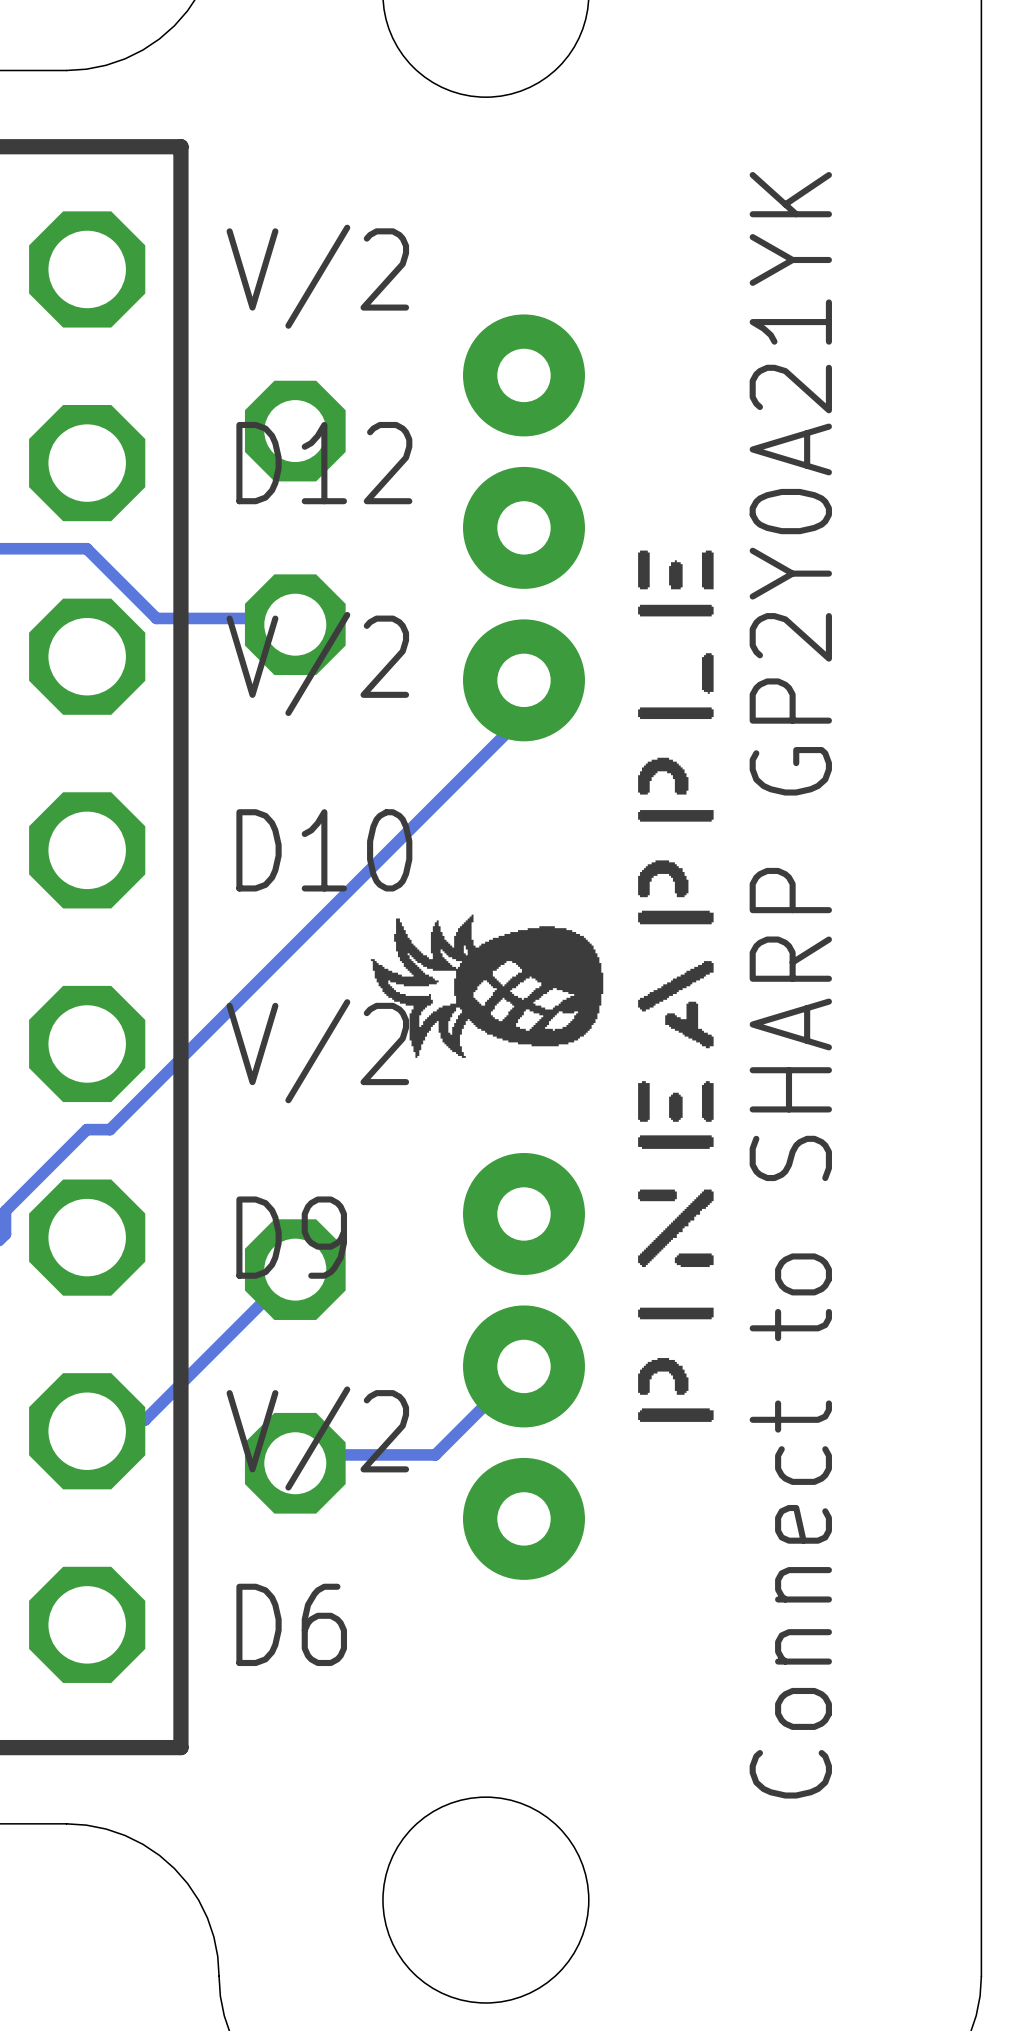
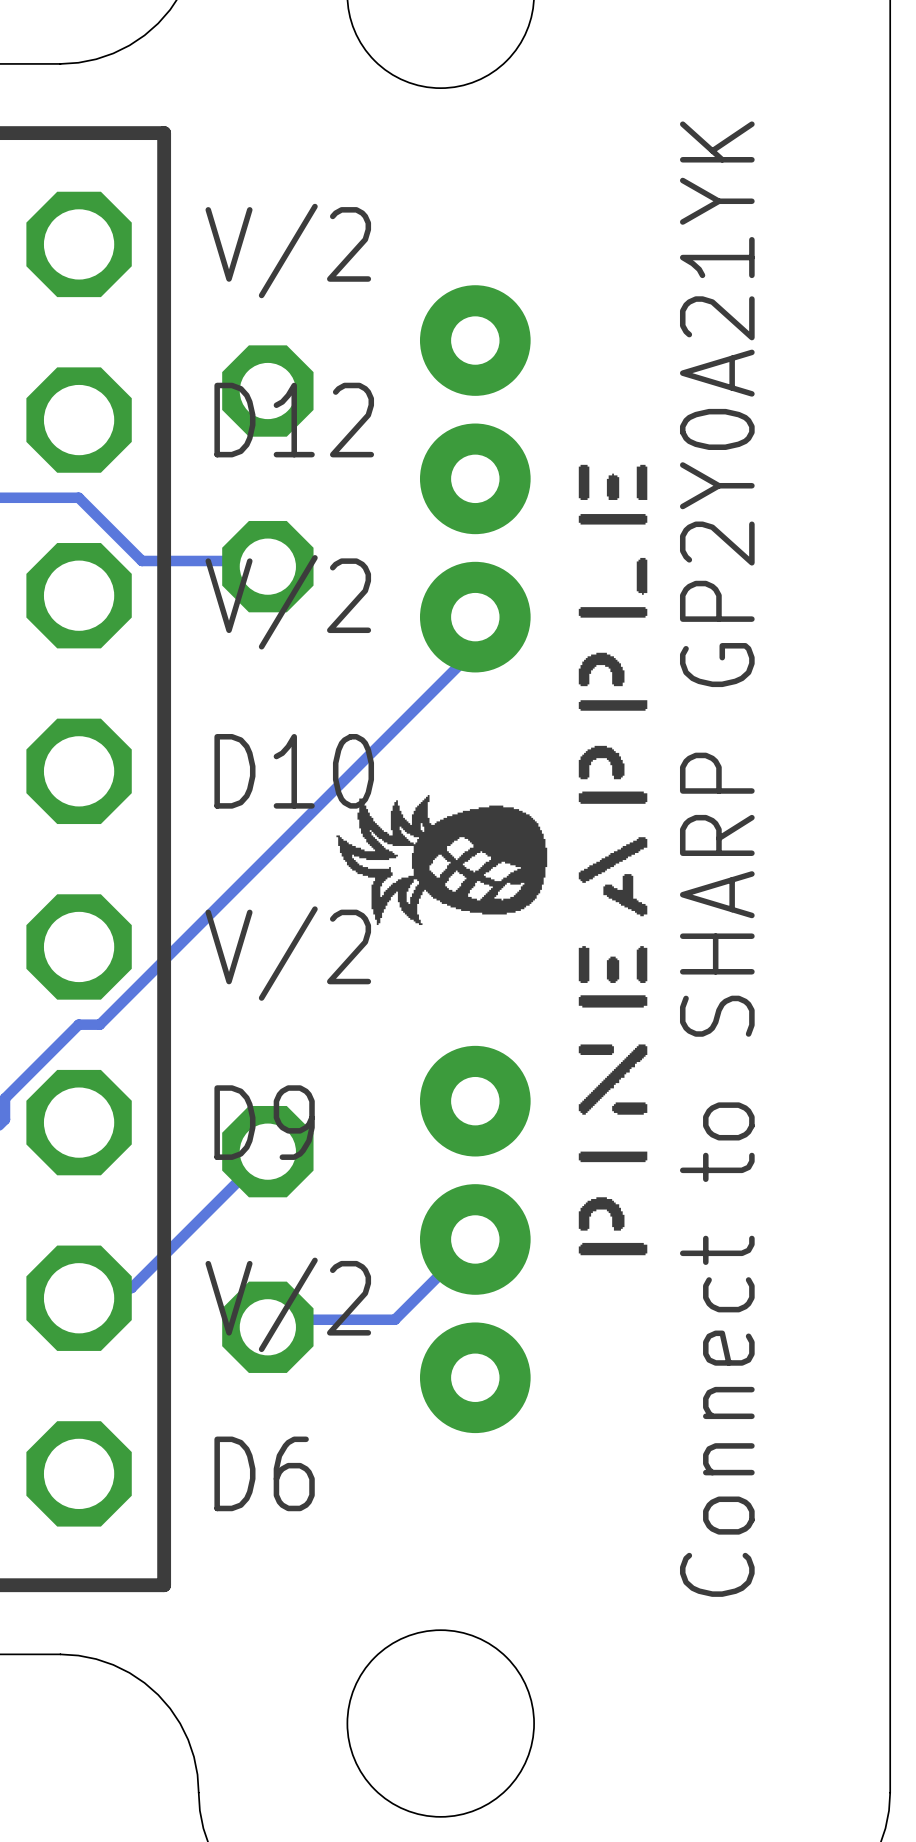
text position: Connect to SHARP GP2Y0A21YK (790, 985) -> Connect to SHARP GP2Y0A21YK (717, 859)
drawing position: (542, 986) -> (491, 860)

